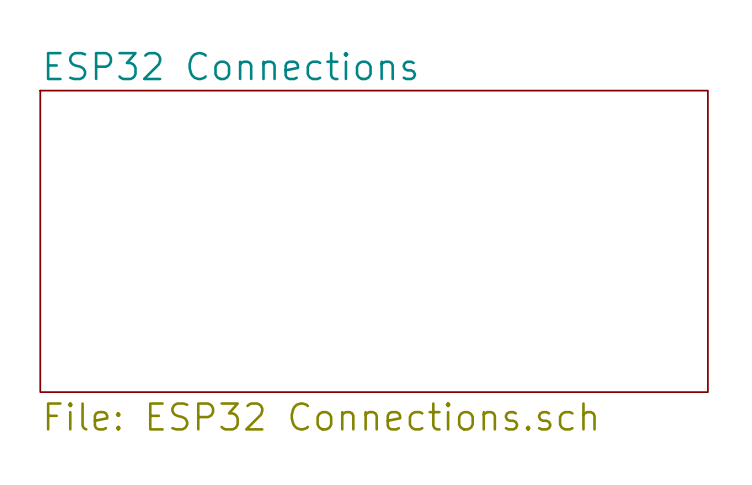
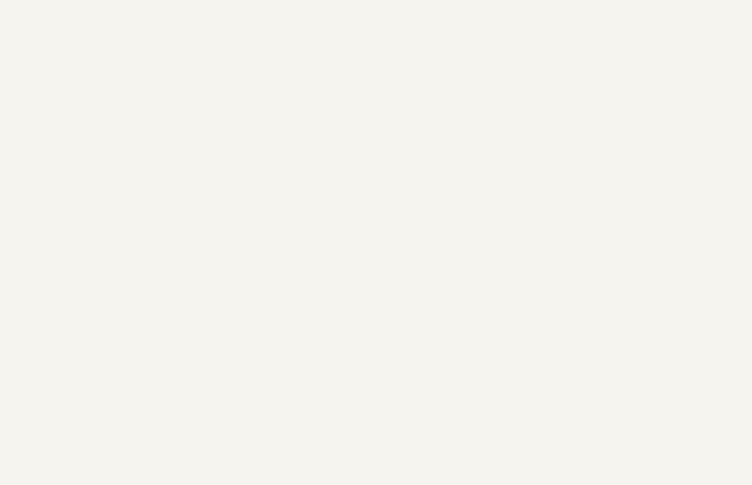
sheet ESP32 Connections: File: ESP32 Connections.sch (374, 241) -> none

